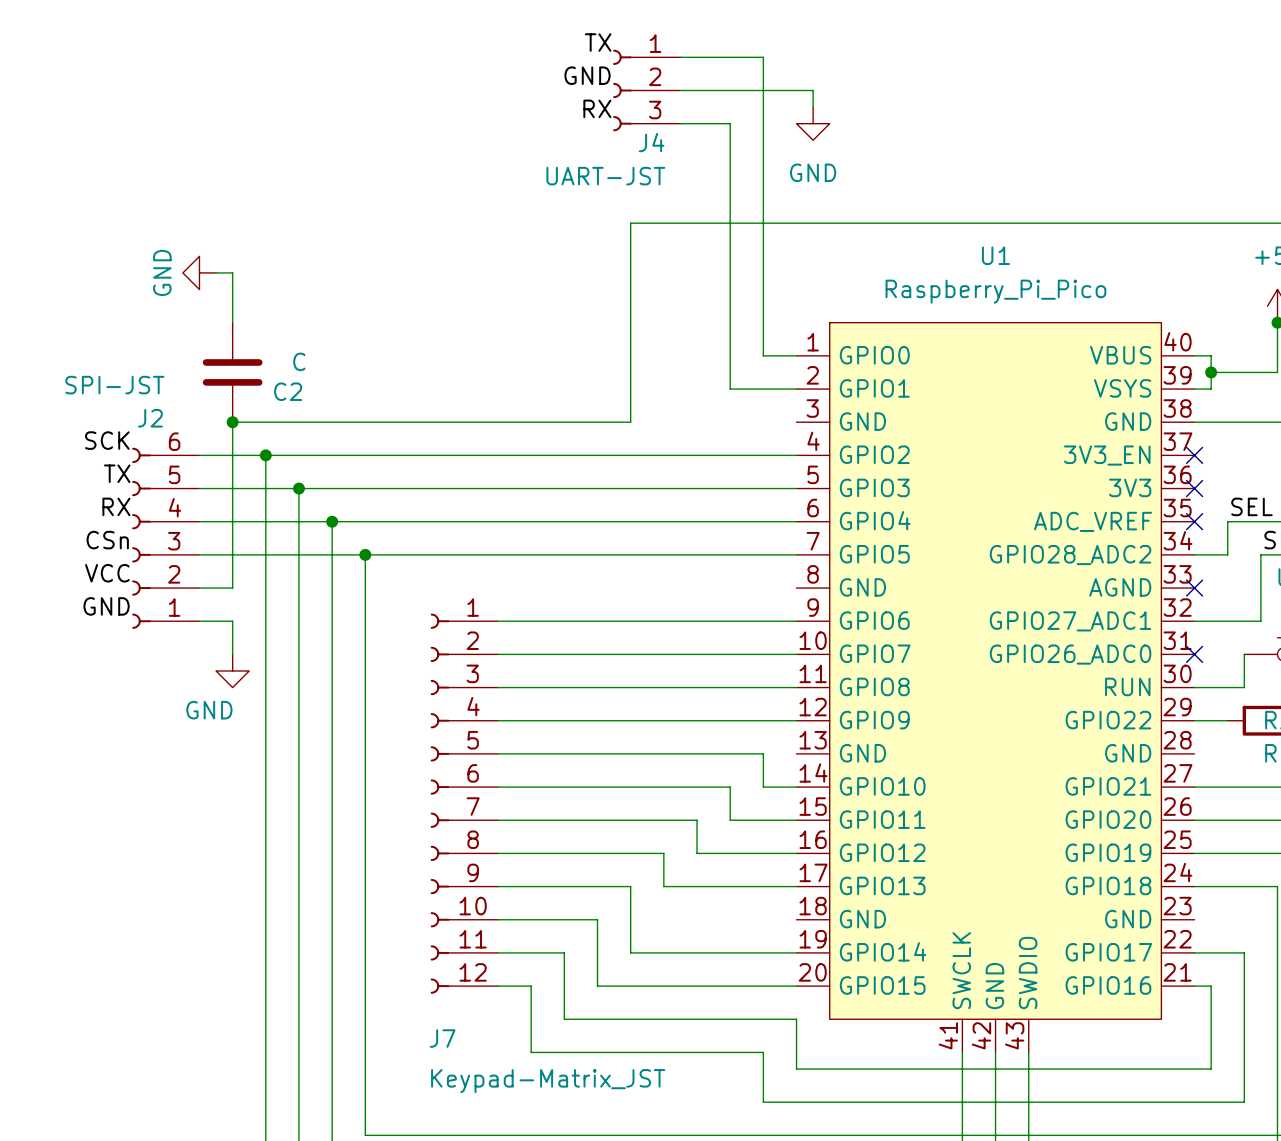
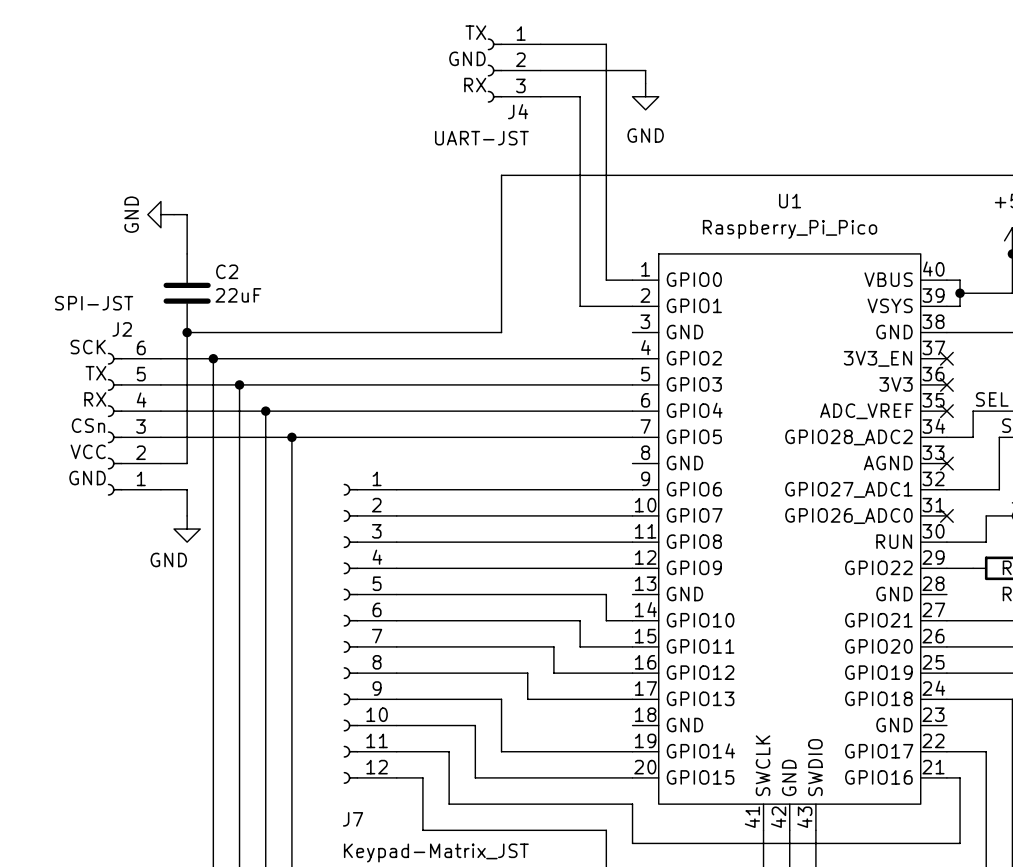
C2 value: C (299, 361) -> 22uF (238, 295)
C2 name position: C2 (288, 391) -> C2 (227, 271)

